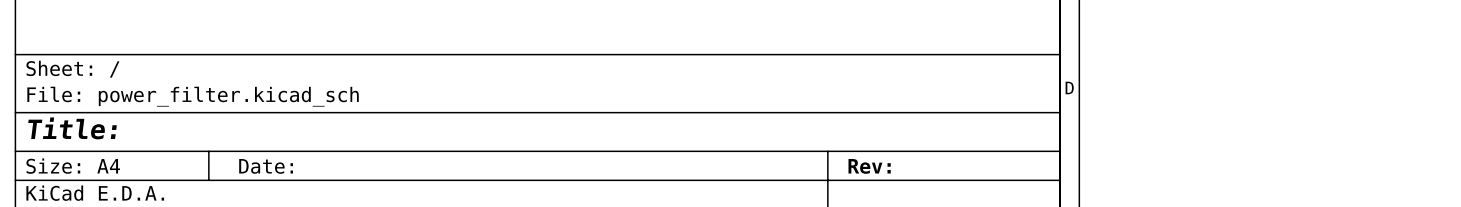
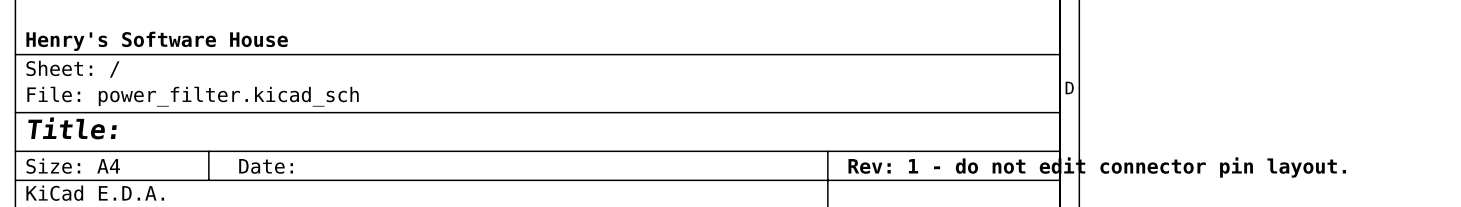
title block: none -> Henry's Software House (157, 41)
title block: Rev: (869, 166) -> Rev: 1 - do not edit connector pin layout. (1097, 167)

